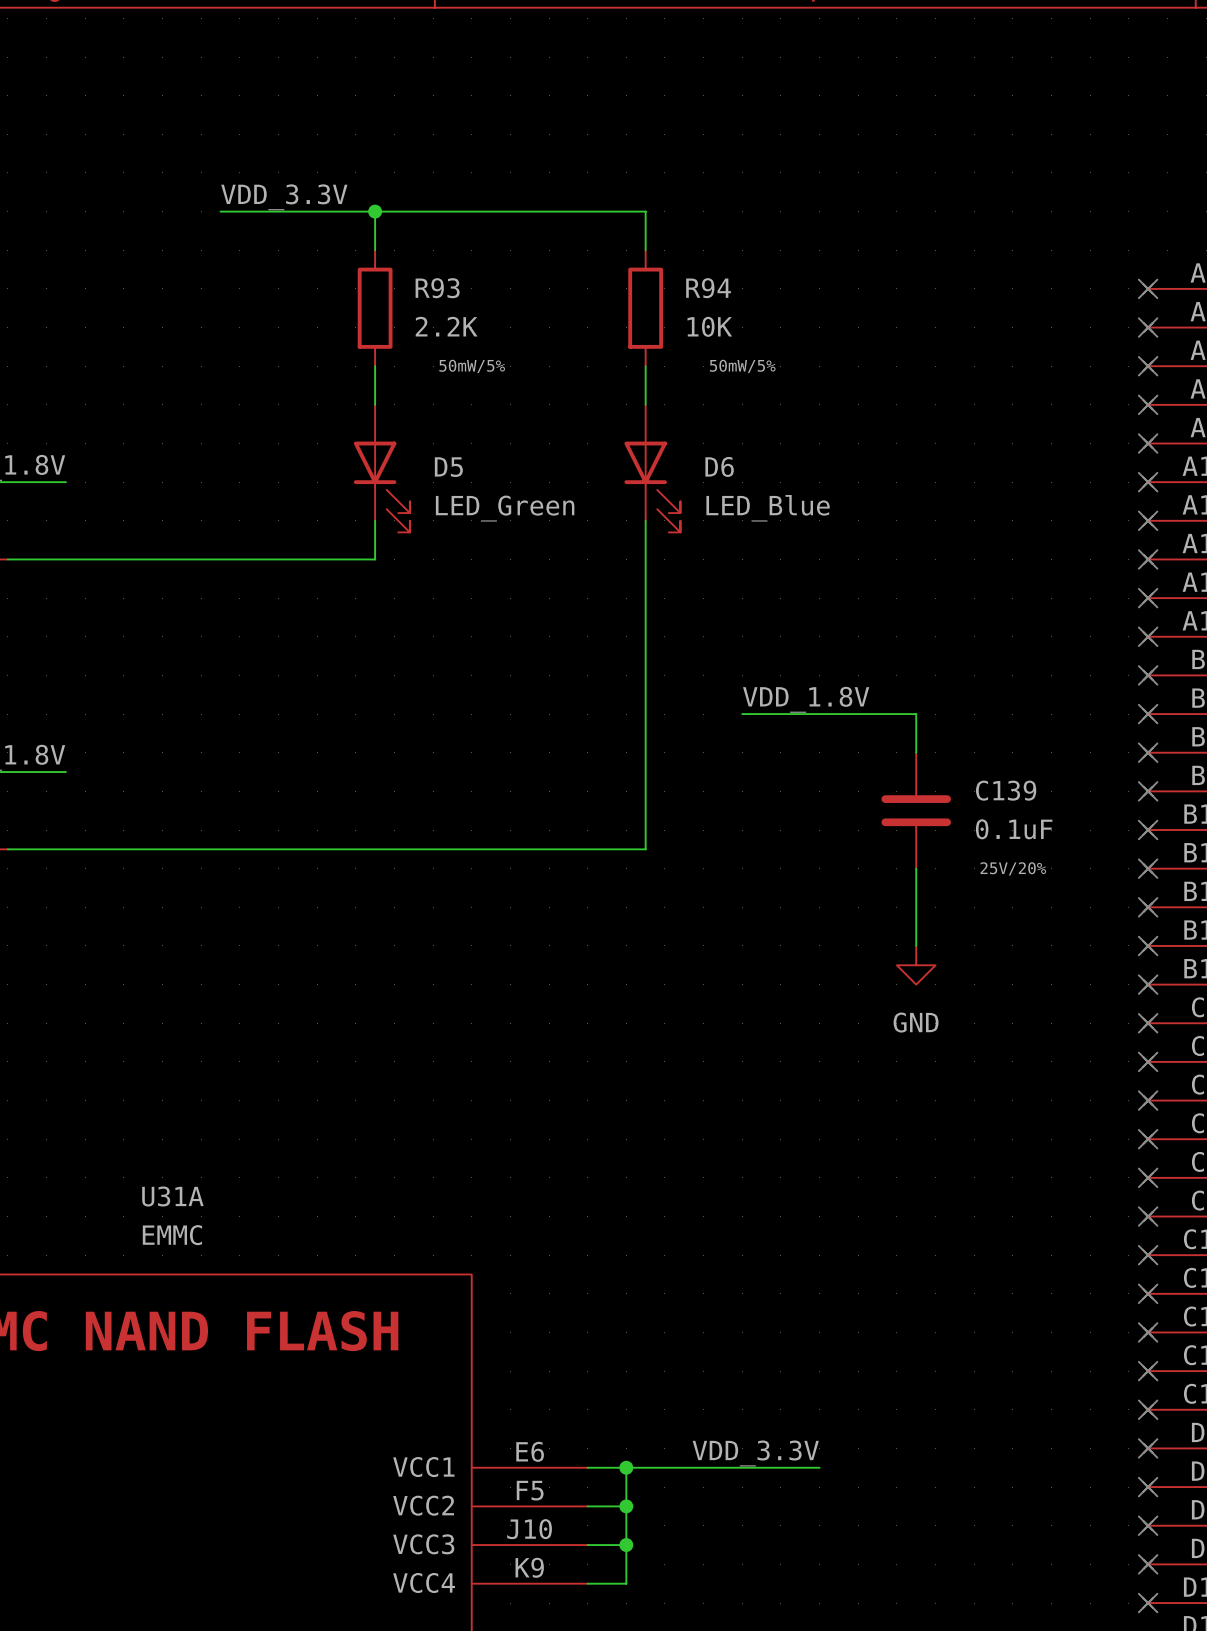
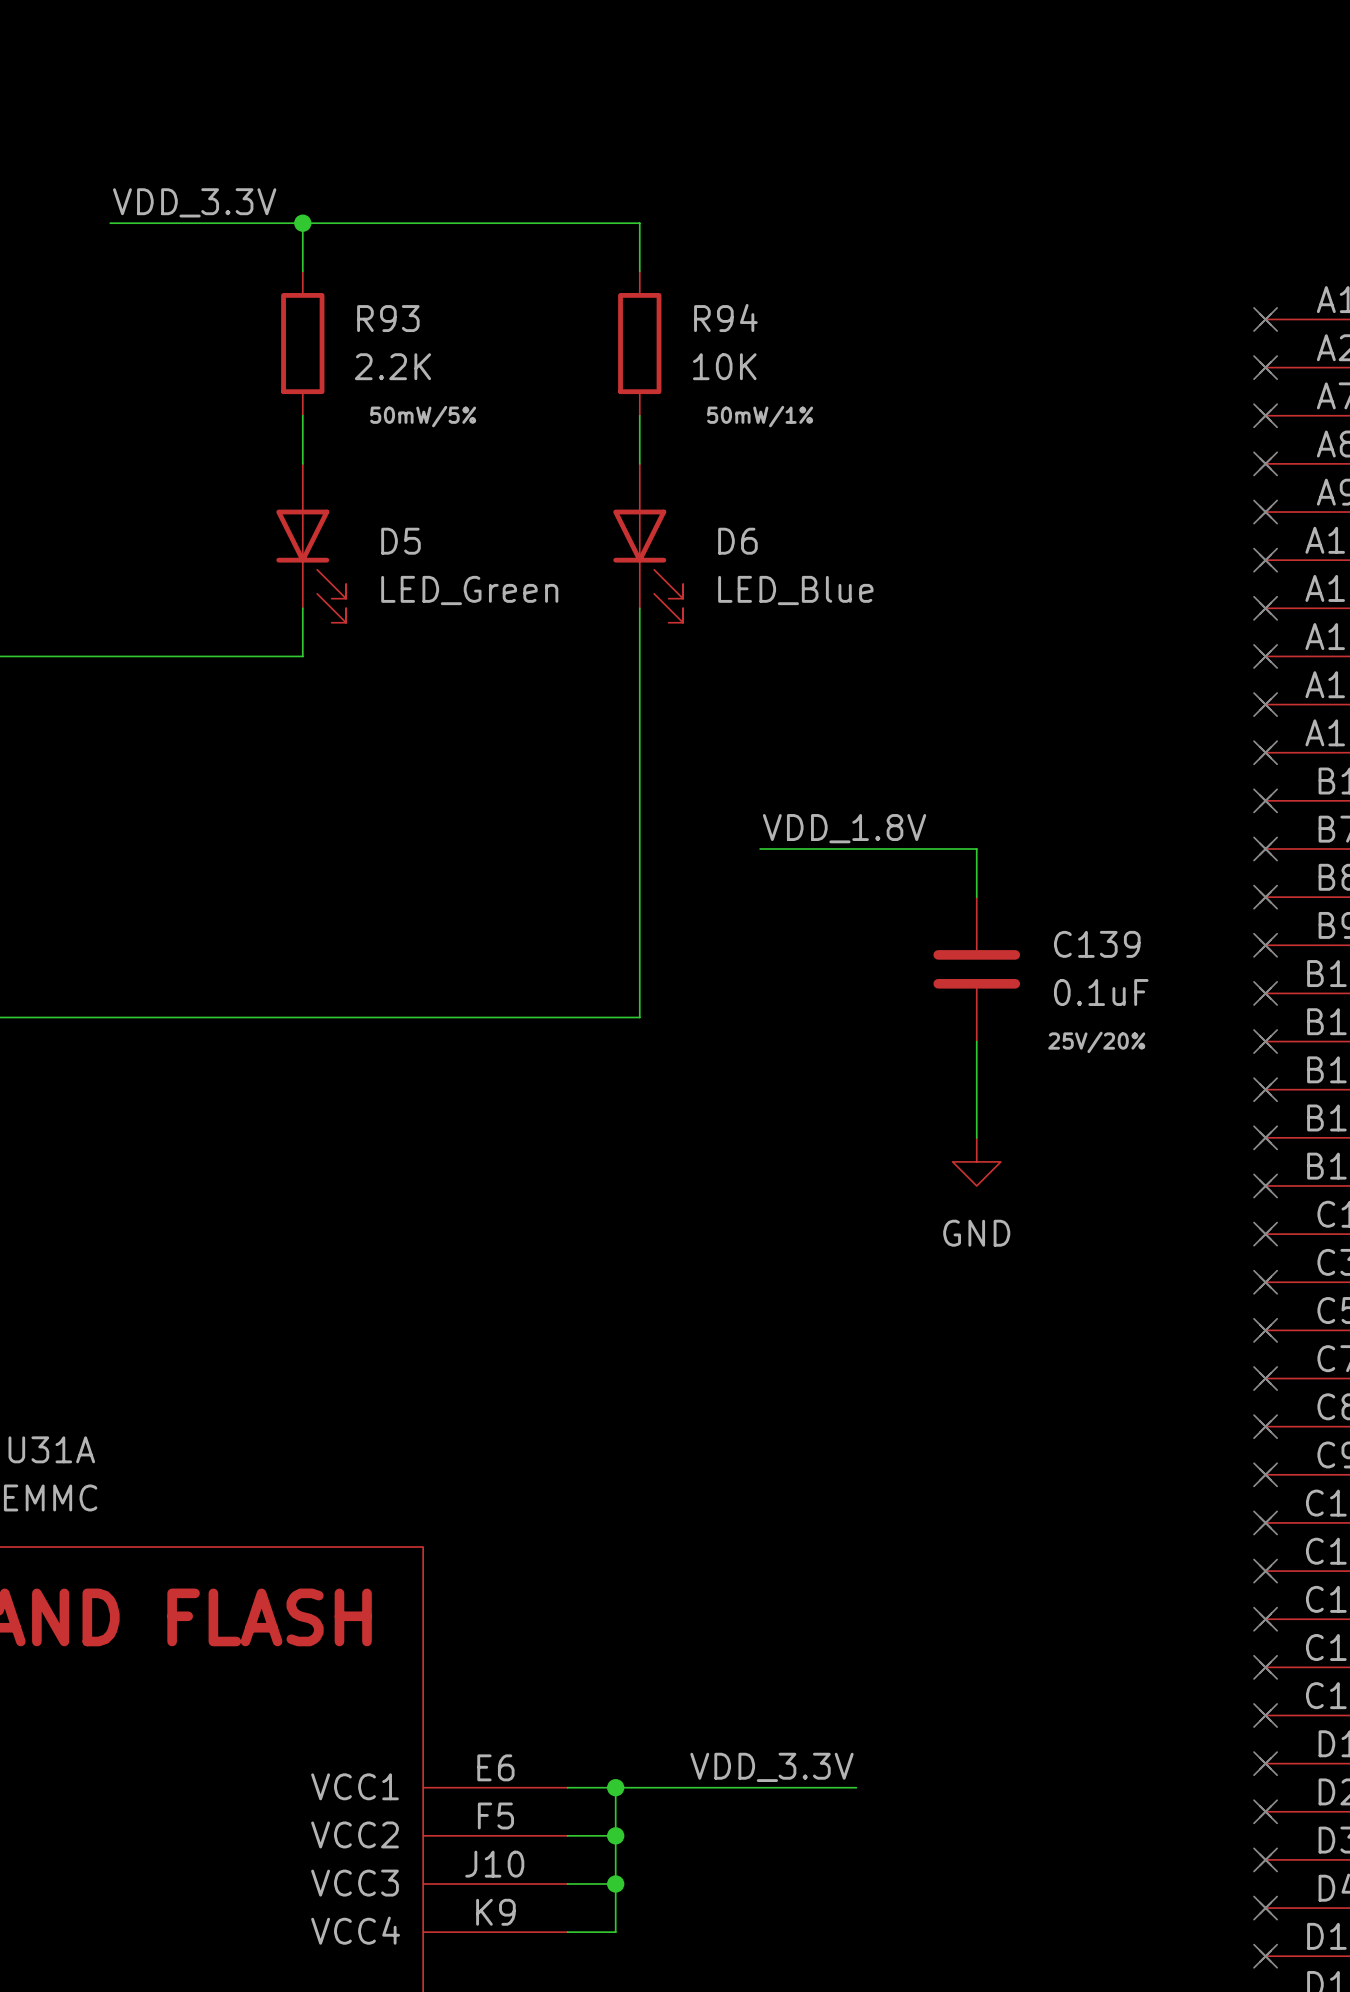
R94 text: 50mW/5% (742, 366) -> 50mW/1% (760, 416)

